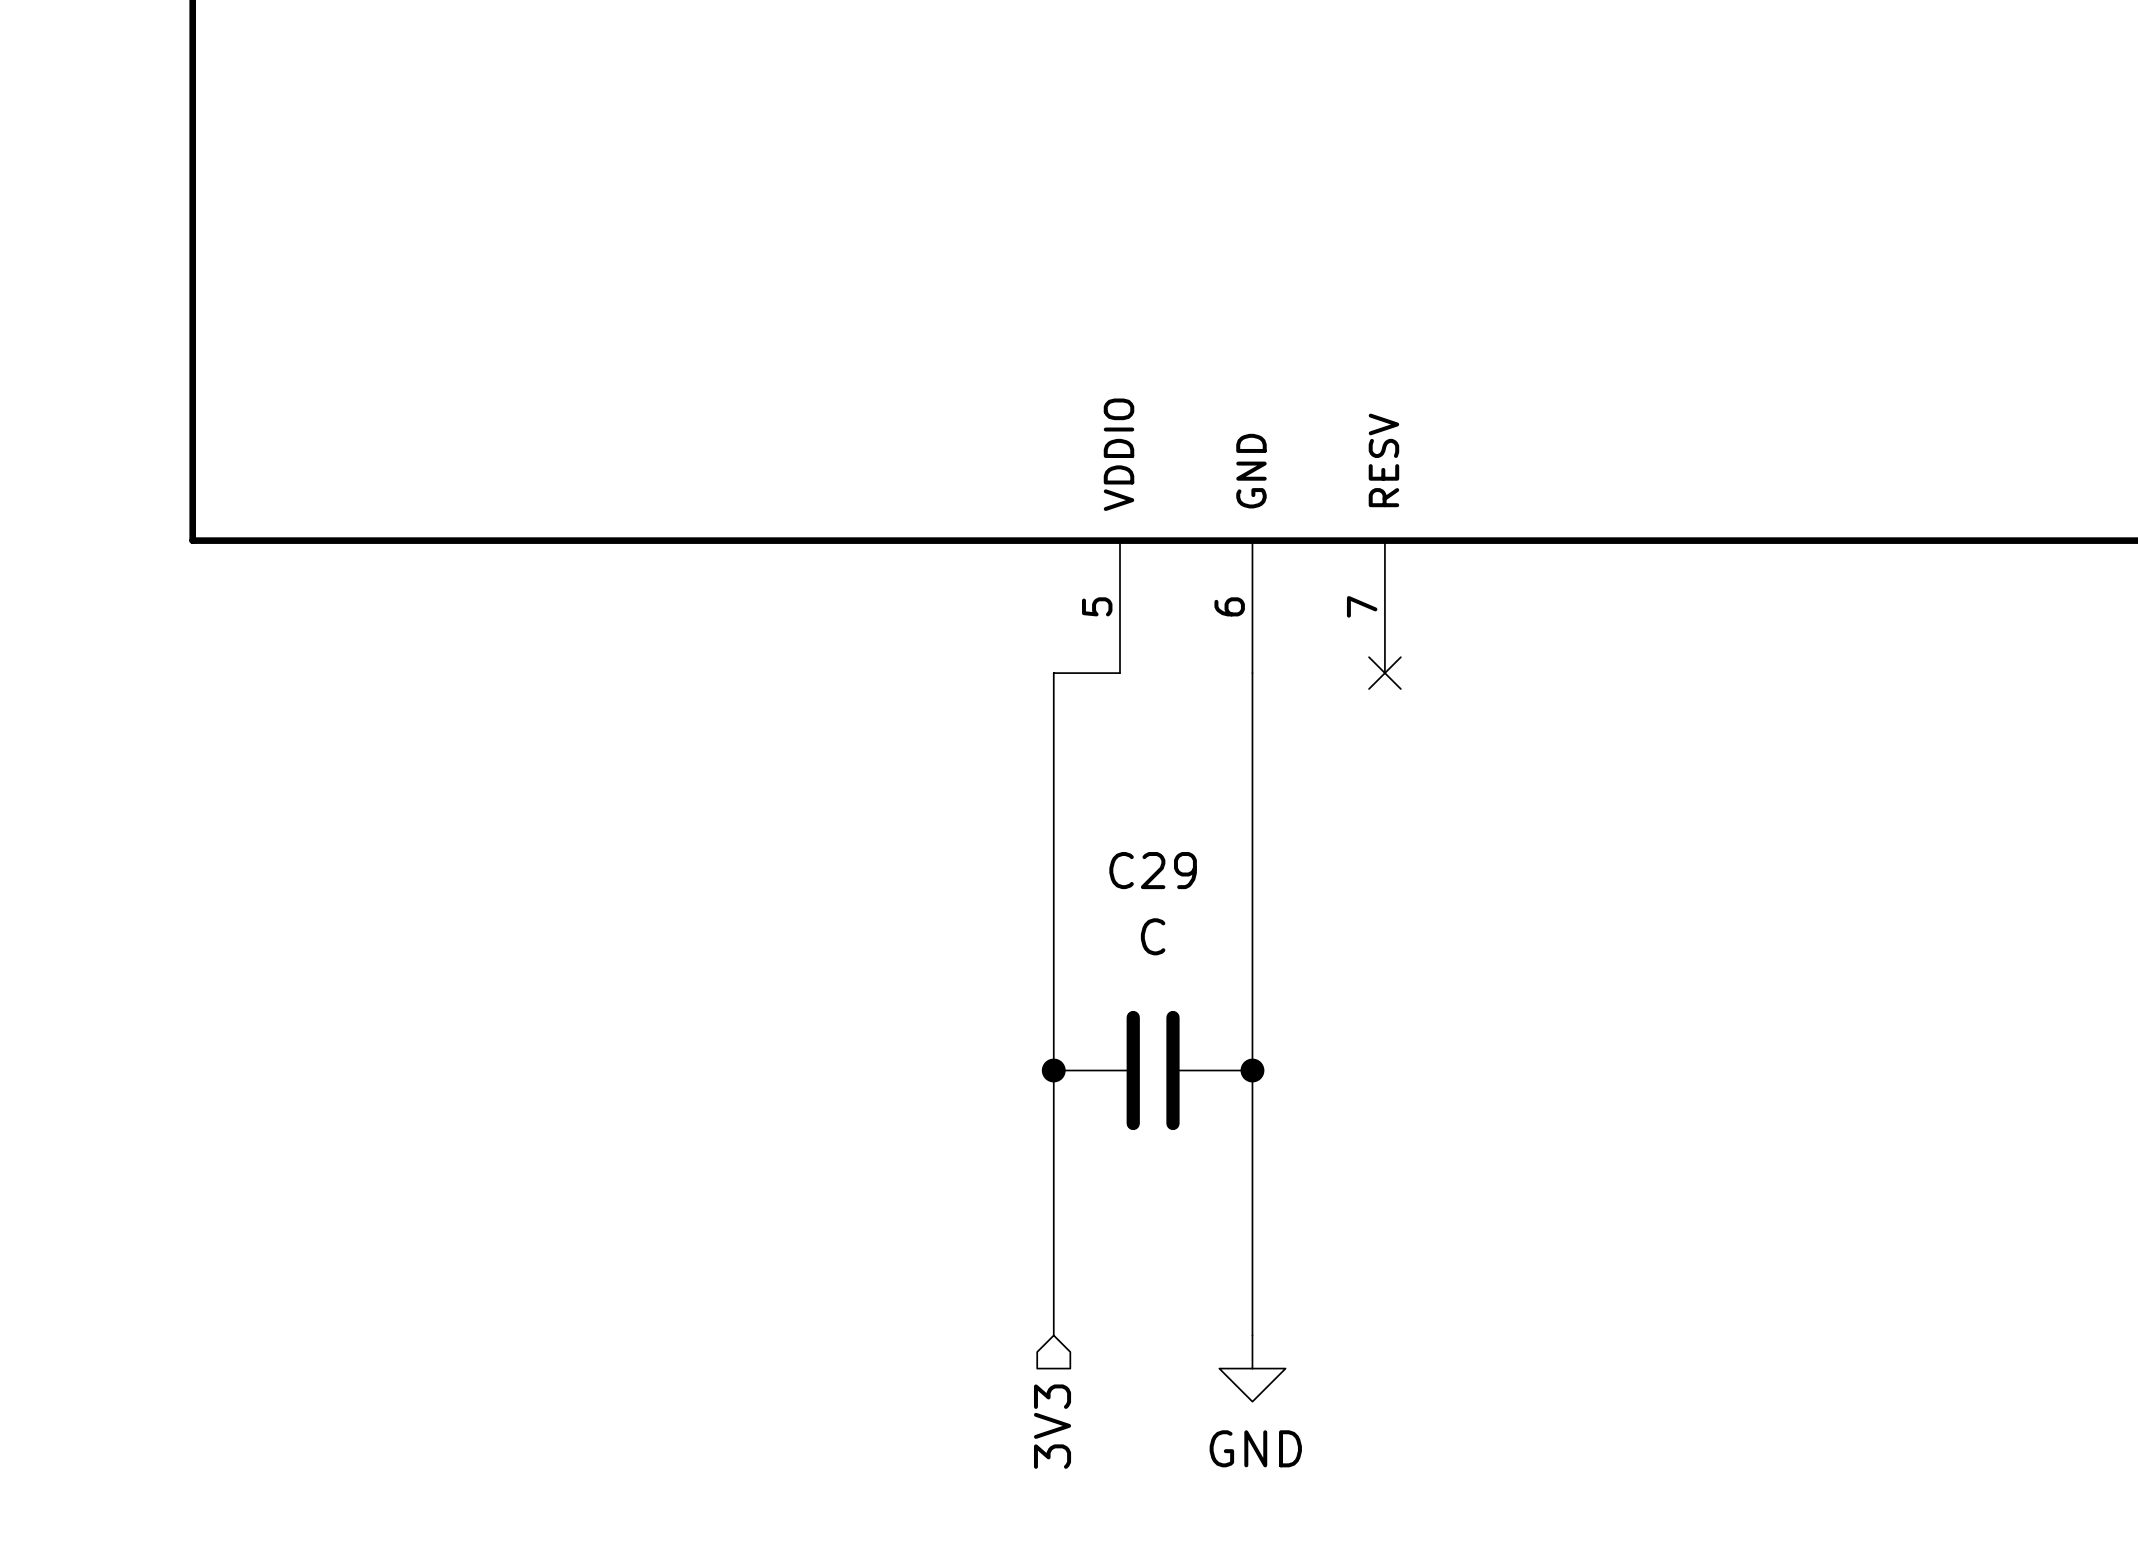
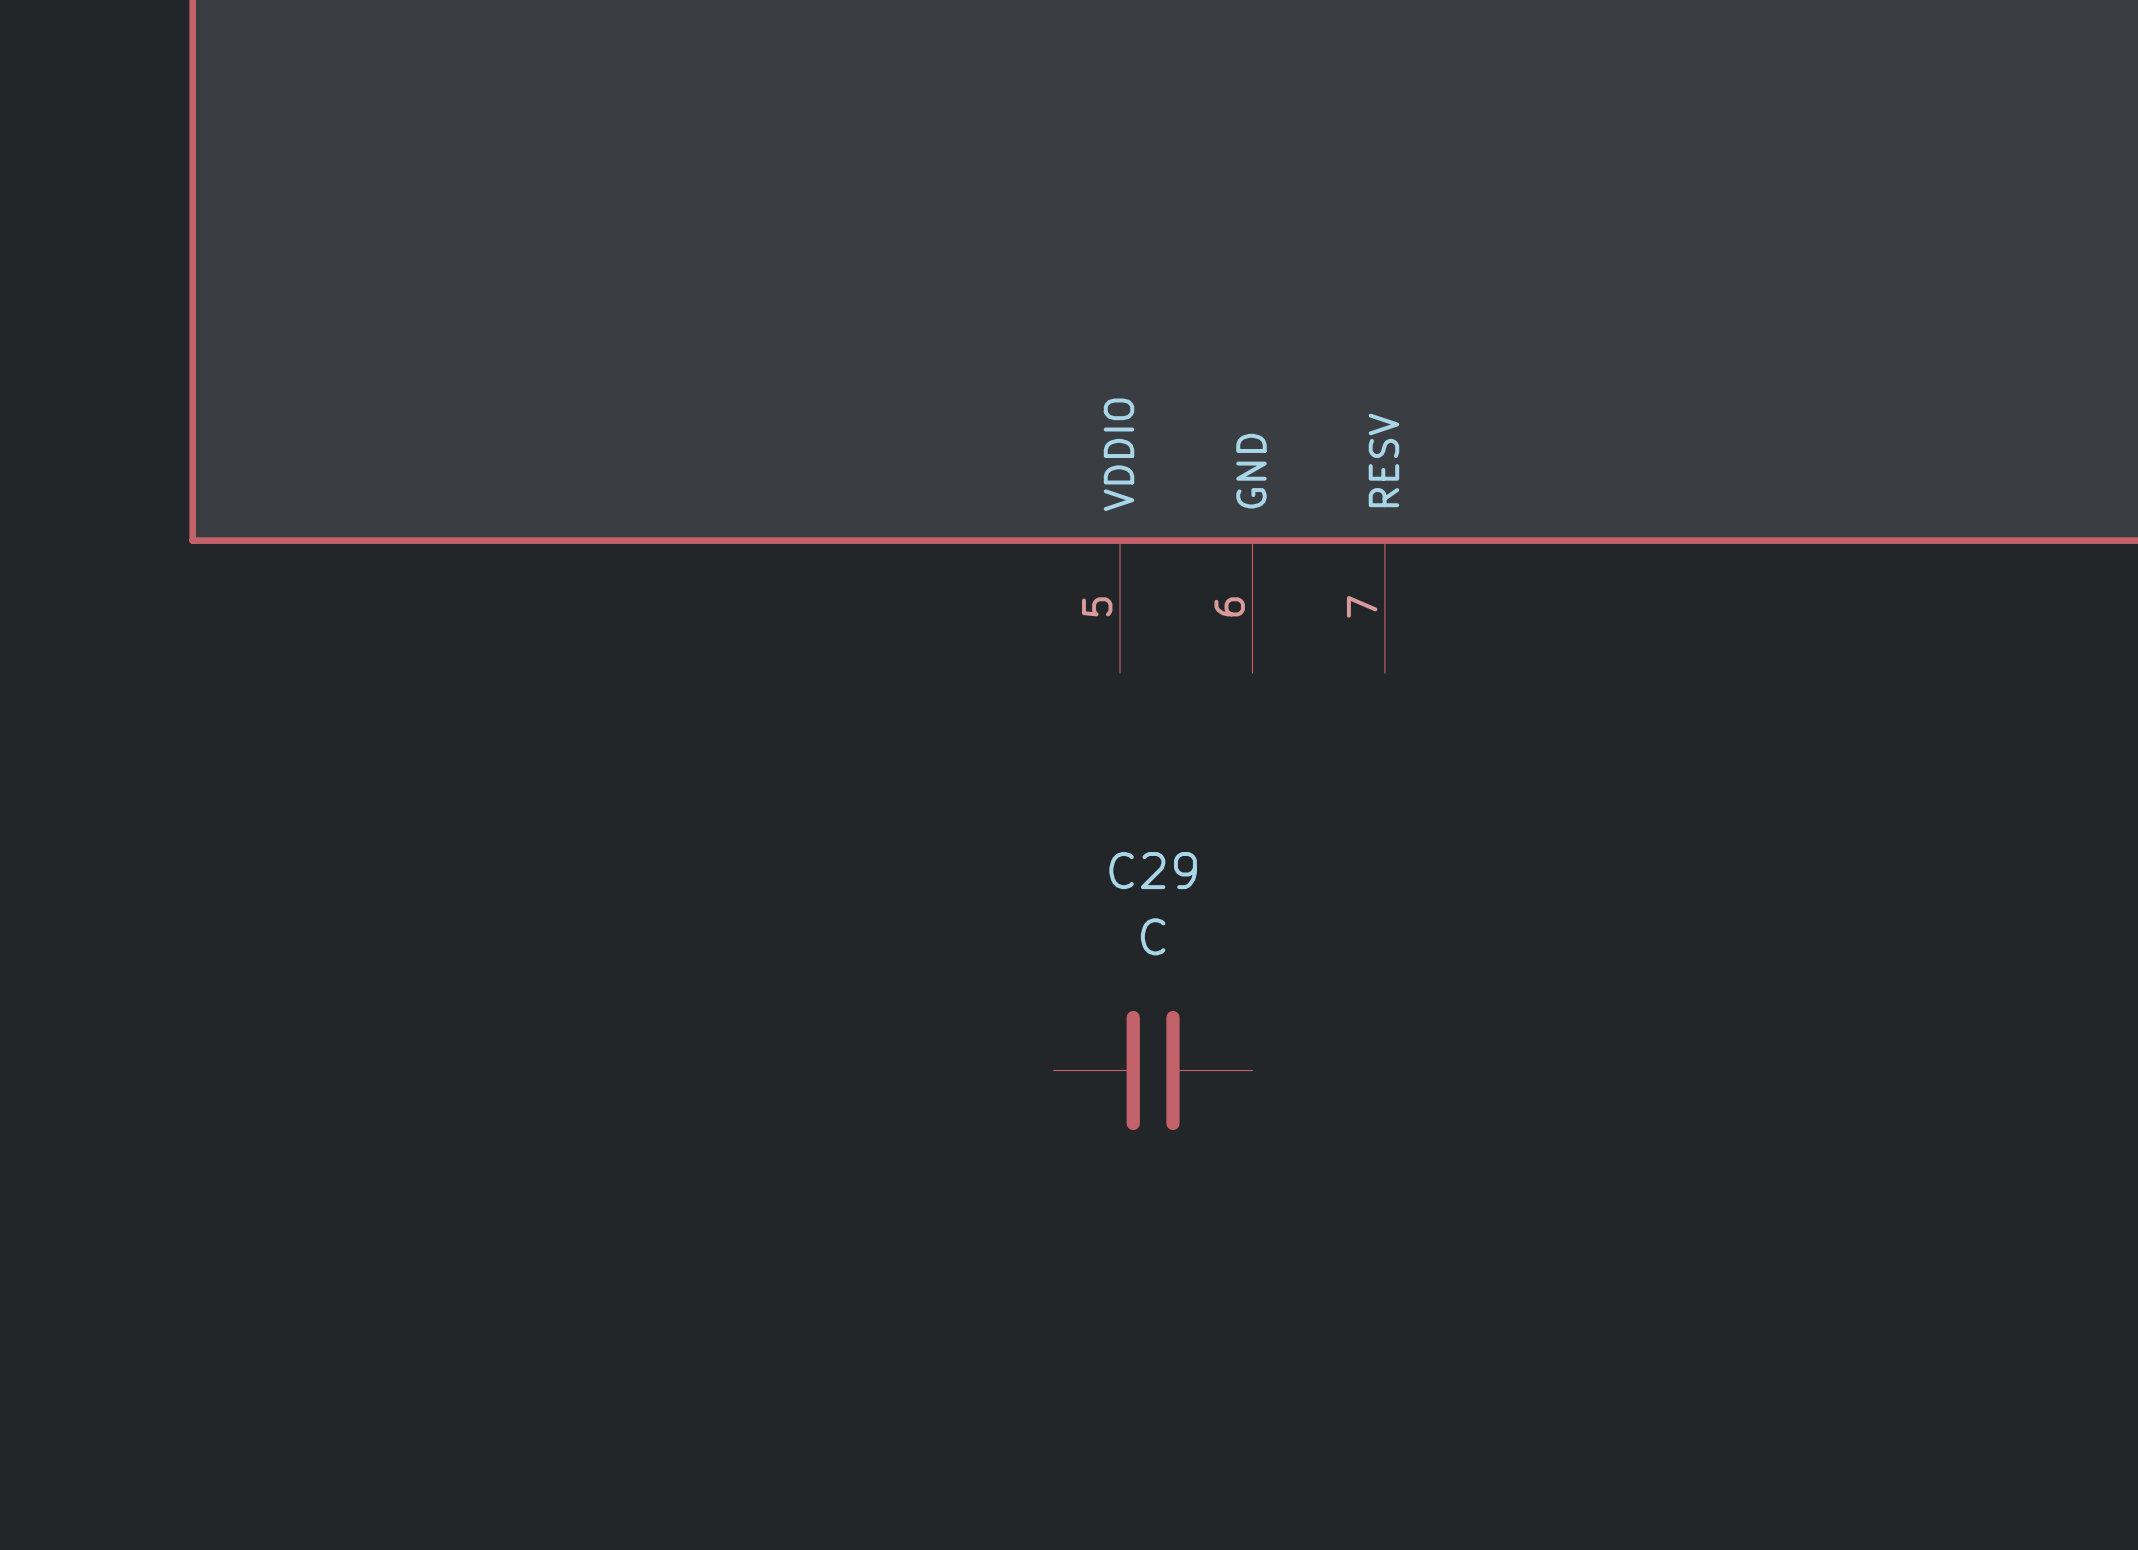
wire: (1120, 673) (1053, 673) (1053, 1335) -> none
wire: (1252, 673) (1252, 1335) -> none
no-connect mark: (1384, 673) -> none
junction: (1053, 1070) -> none
junction: (1252, 1070) -> none
power symbol: GND (1252, 1368) -> none
hierarchical label: 3V3 (1052, 1426) -> none

